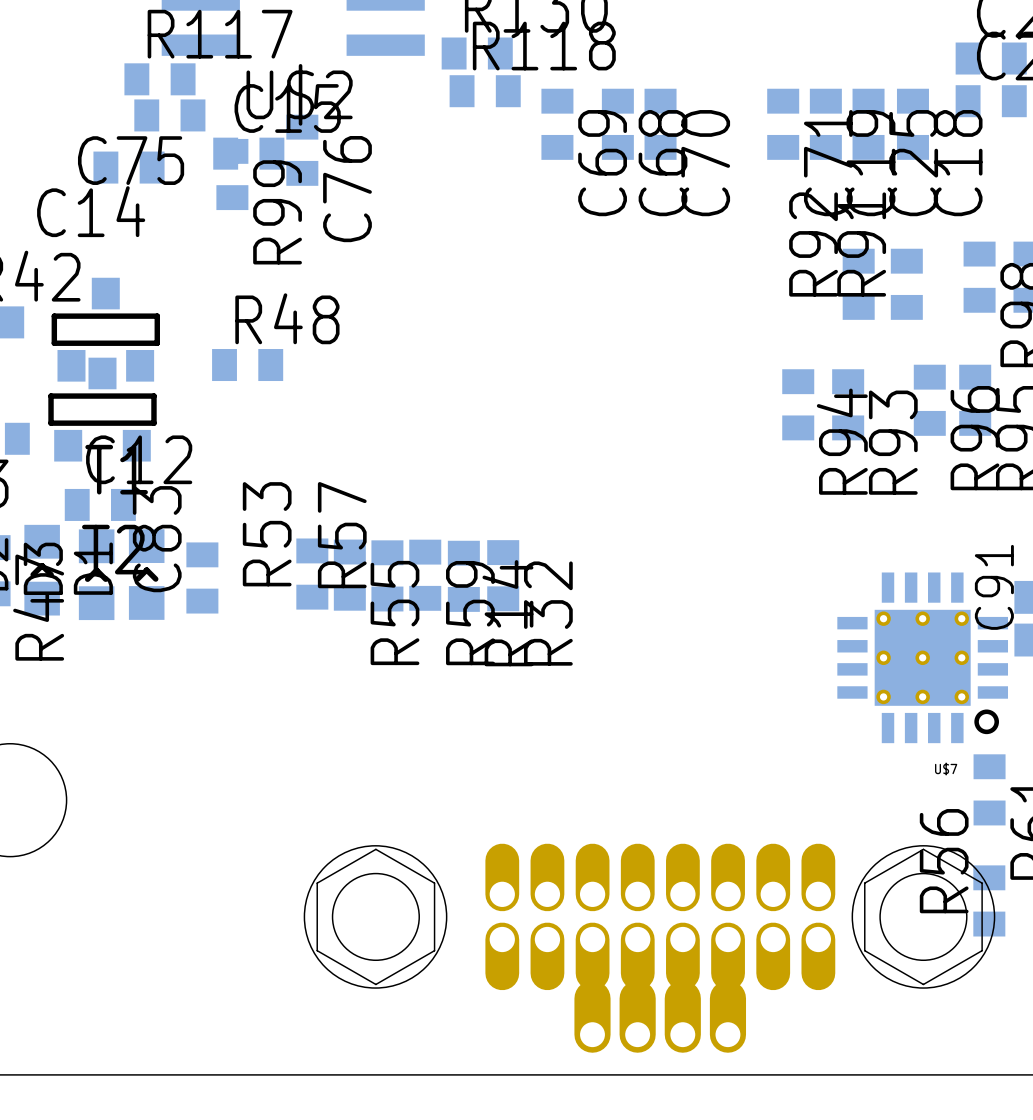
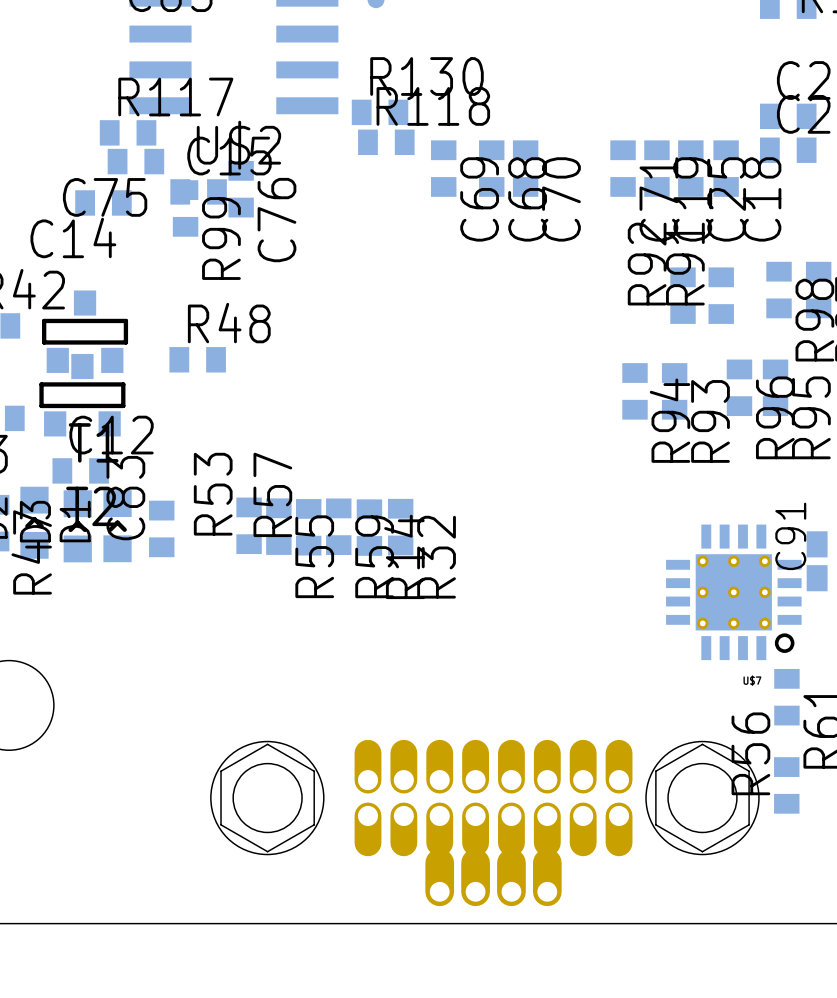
part position: (649, 916) -> (484, 798)
part position: (660, 1016) -> (493, 877)

